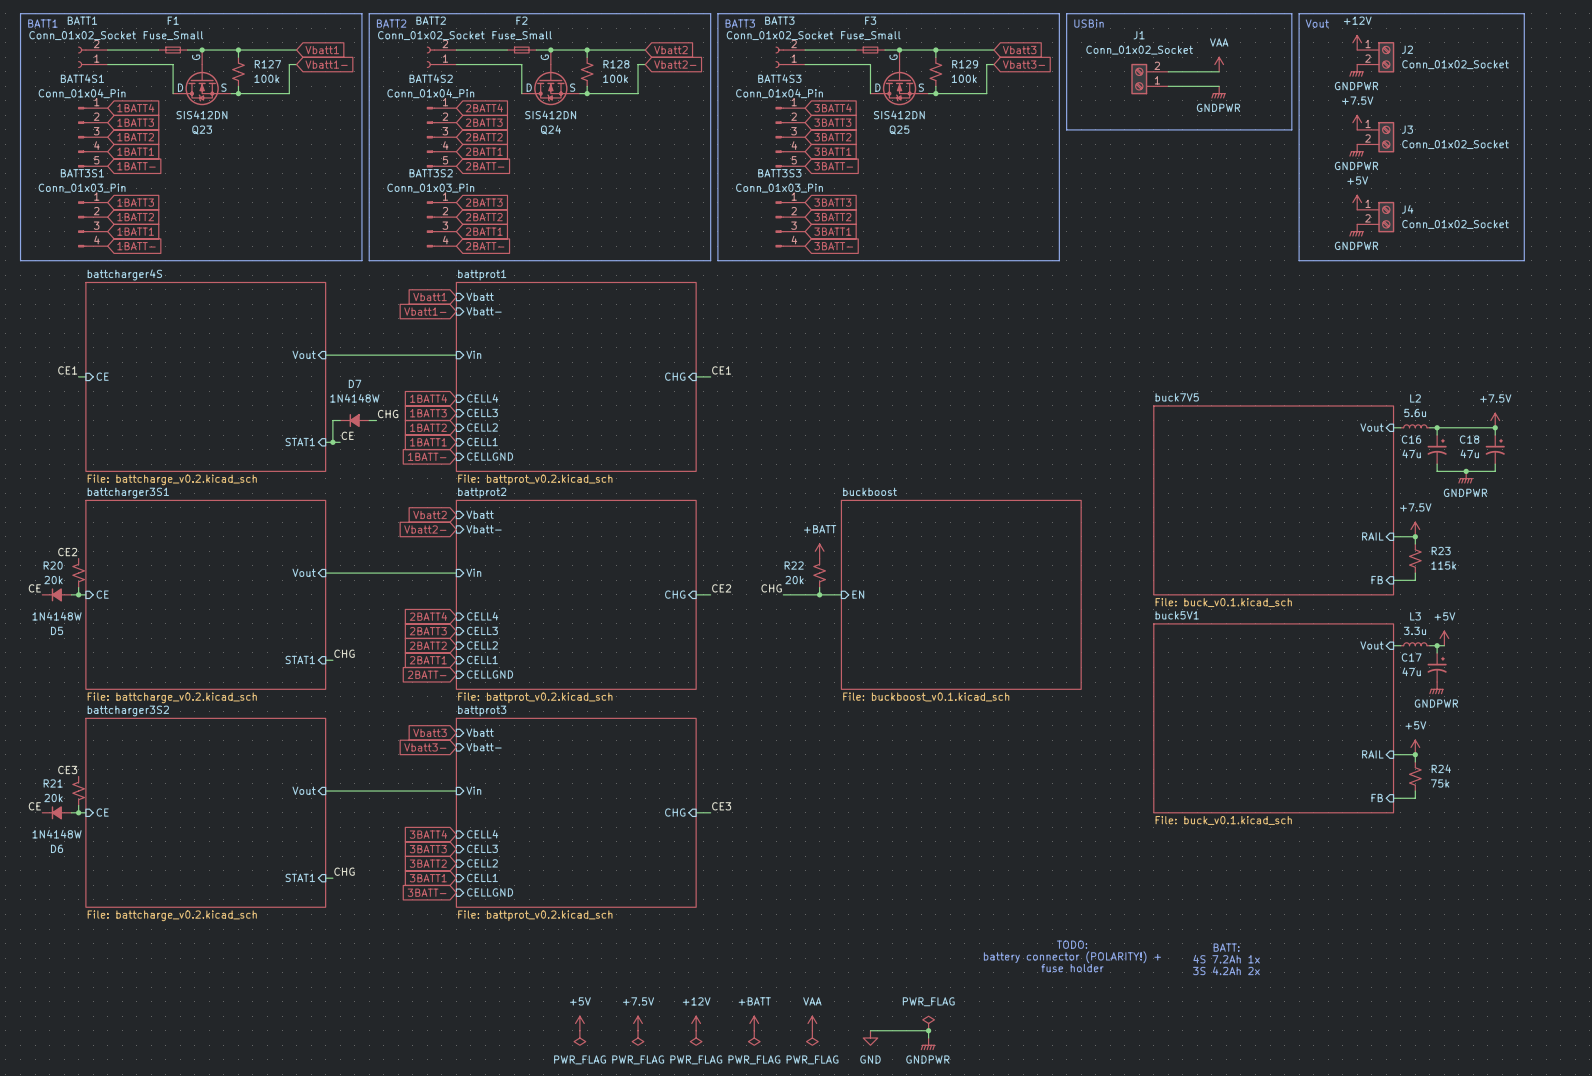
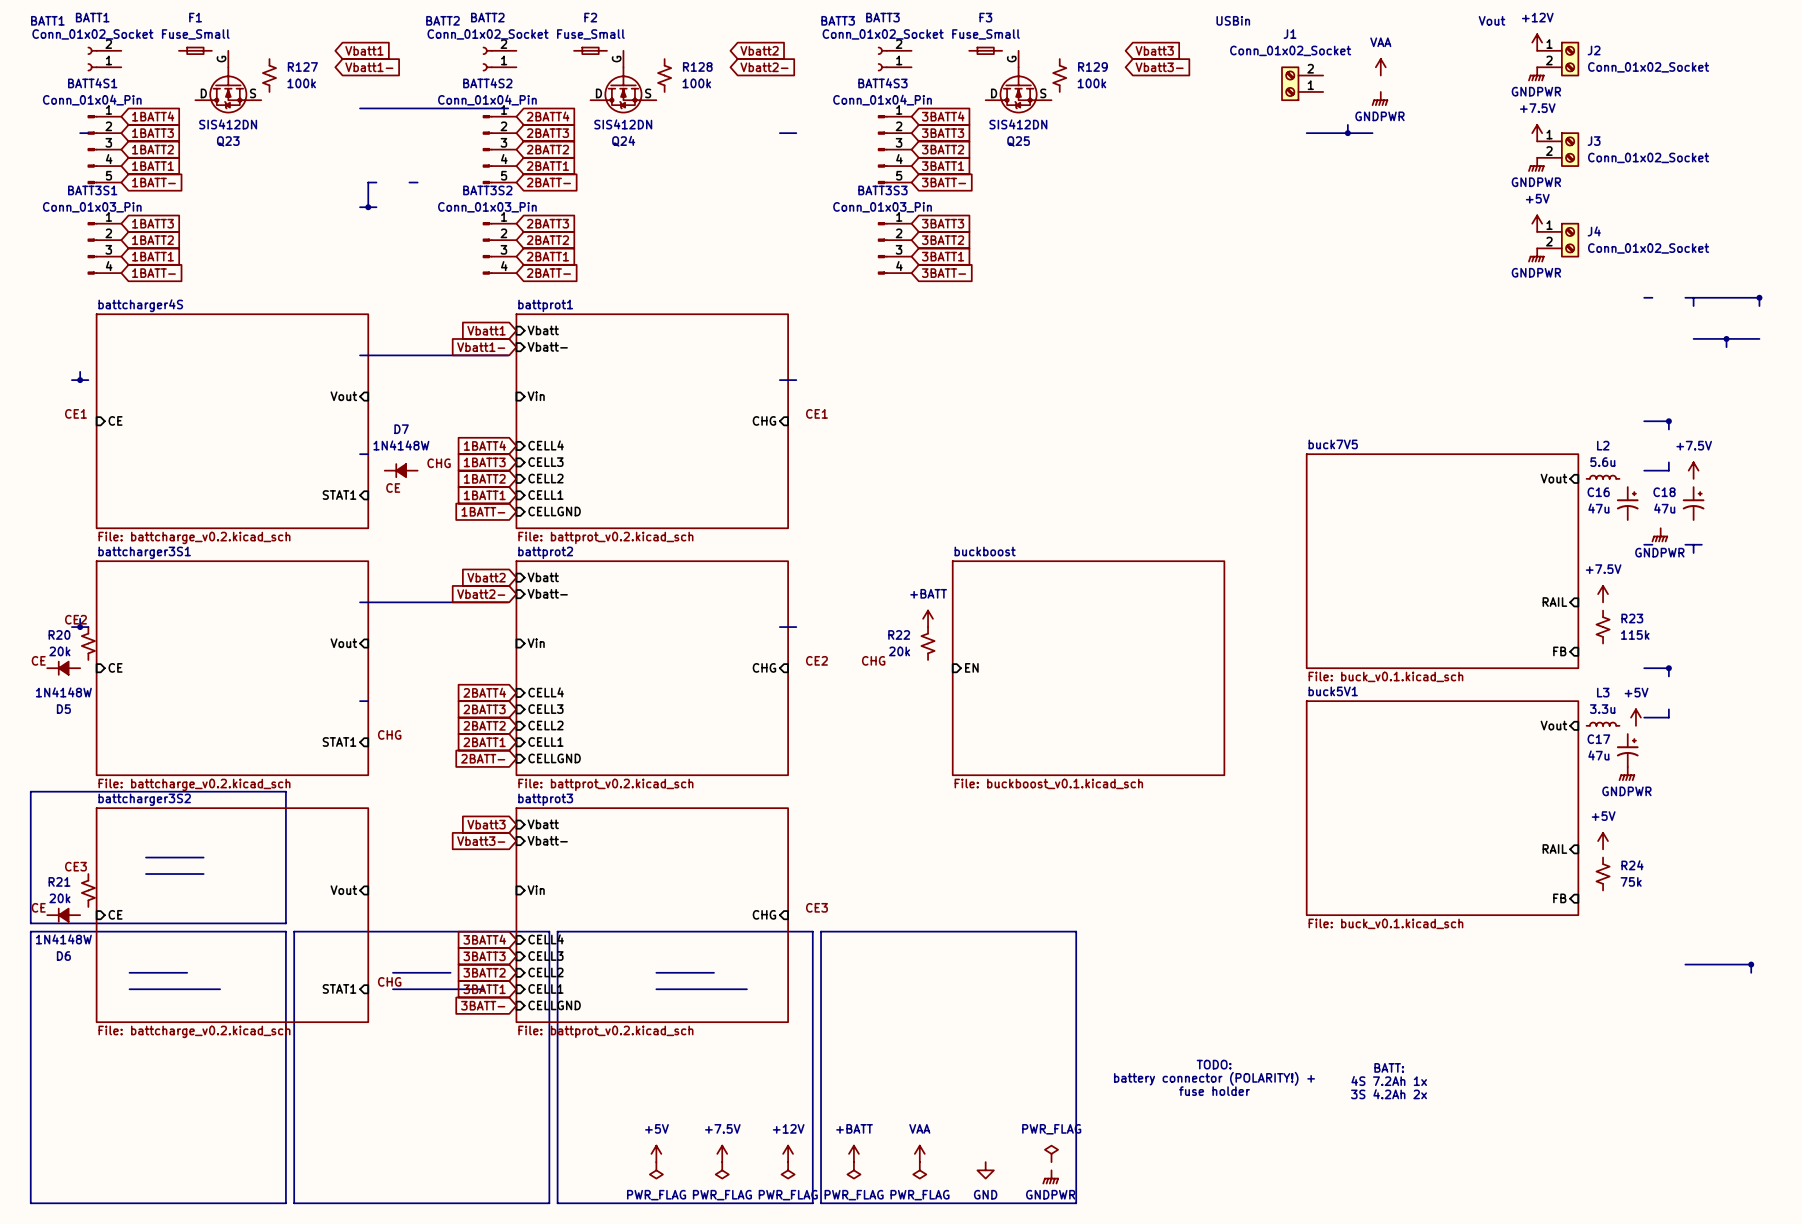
line: (20, 13) (361, 13) (361, 260) (20, 260) (20, 13) -> none
line: (369, 13) (710, 13) (710, 260) (369, 260) (369, 13) -> none
line: (717, 13) (1059, 13) (1059, 260) (717, 260) (717, 13) -> none
line: (1066, 13) (1291, 13) (1291, 129) (1066, 129) (1066, 13) -> none
line: (1299, 13) (1524, 13) (1524, 260) (1299, 260) (1299, 13) -> none
wire: (107, 50) (158, 50) -> none
wire: (187, 50) (296, 50) -> none
junction: (202, 50) -> none
wire: (238, 50) (238, 57) -> none
junction: (238, 50) -> none
wire: (456, 50) (507, 50) -> none
wire: (536, 50) (645, 50) -> none
junction: (550, 50) -> none
wire: (587, 50) (587, 57) -> none
junction: (587, 50) -> none
wire: (805, 50) (855, 50) -> none
wire: (885, 50) (993, 50) -> none
junction: (899, 50) -> none
wire: (935, 50) (935, 57) -> none
junction: (935, 50) -> none
wire: (107, 64) (173, 64) (173, 93) -> none
wire: (296, 64) (289, 64) (289, 93) (231, 93) -> none
wire: (456, 64) (521, 64) (521, 93) -> none
wire: (645, 64) (638, 64) (638, 93) (579, 93) -> none
wire: (805, 64) (870, 64) (870, 93) -> none
wire: (993, 64) (986, 64) (986, 93) (928, 93) -> none
wire: (1168, 71) (1219, 71) -> none
wire: (238, 86) (238, 93) -> none
wire: (587, 86) (587, 93) -> none
wire: (935, 86) (935, 93) -> none
wire: (1168, 86) (1219, 86) -> none
junction: (238, 93) -> none
junction: (587, 93) -> none
junction: (935, 93) -> none
wire: none -> (360, 108) (508, 108)
wire: none -> (1347, 124) (1347, 133)
wire: none -> (80, 133) (88, 133)
wire: none -> (779, 133) (796, 133)
wire: none -> (1306, 133) (1372, 133)
junction: none -> (1347, 133)
wire: none -> (376, 182) (368, 182) (368, 207)
wire: none -> (409, 182) (417, 182)
wire: none -> (360, 207) (376, 207)
junction: none -> (368, 207)
wire: none -> (1644, 297) (1652, 297)
wire: none -> (1685, 297) (1759, 297) (1759, 306)
wire: none -> (1693, 297) (1693, 306)
junction: none -> (1759, 297)
wire: none -> (1693, 338) (1759, 338)
wire: none -> (1726, 338) (1726, 347)
junction: none -> (1726, 338)
wire: none -> (80, 371) (80, 380)
wire: none -> (71, 380) (88, 380)
junction: none -> (80, 380)
wire: (325, 355) (456, 355) -> (360, 355) (508, 355)
wire: (78, 376) (85, 376) -> none
wire: (696, 376) (710, 376) -> (779, 380) (796, 380)
wire: none -> (1644, 421) (1668, 421) (1668, 429)
junction: none -> (1668, 421)
wire: none -> (1668, 462) (1668, 470) (1644, 470)
wire: (340, 420) (332, 420) (332, 442) -> none
wire: (369, 420) (376, 420) -> (360, 454) (368, 454)
wire: (1393, 427) (1400, 427) -> (1644, 544) (1652, 544)
wire: (1429, 427) (1495, 427) (1495, 435) -> none
wire: (1437, 427) (1437, 435) -> (1693, 544) (1693, 552)
junction: (1437, 427) -> none
junction: (1495, 427) -> none
wire: (325, 442) (340, 442) -> none
junction: (332, 442) -> none
wire: (1437, 464) (1437, 471) (1495, 471) (1495, 464) -> none
junction: (1466, 471) -> none
wire: none -> (1685, 544) (1701, 544)
wire: (1393, 536) (1415, 536) (1415, 544) -> (1644, 668) (1668, 668) (1668, 676)
junction: (1415, 536) -> none
junction: none -> (80, 627)
wire: (325, 573) (456, 573) -> (360, 602) (508, 602)
wire: (1415, 573) (1415, 580) (1393, 580) -> (1668, 709) (1668, 717) (1644, 717)
wire: (78, 587) (78, 594) -> (80, 618) (80, 627)
wire: (819, 587) (819, 594) -> none
wire: (71, 594) (85, 594) -> (71, 627) (88, 627)
junction: (78, 594) -> none
wire: (696, 594) (710, 594) -> (779, 627) (796, 627)
wire: (783, 594) (841, 594) -> none
junction: (819, 594) -> none
junction: none -> (1668, 668)
wire: (1393, 645) (1400, 645) -> none
wire: (1429, 645) (1444, 645) -> none
wire: (1437, 645) (1437, 652) -> none
junction: (1437, 645) -> none
wire: (325, 660) (332, 660) -> (360, 701) (368, 701)
line: none -> (30, 791) (285, 791) (285, 923) (30, 923) (30, 791)
wire: (1393, 754) (1415, 754) (1415, 761) -> none
junction: (1415, 754) -> none
wire: none -> (146, 857) (203, 857)
wire: none -> (146, 874) (203, 874)
wire: (325, 791) (456, 791) -> none
wire: (1415, 791) (1415, 798) (1393, 798) -> none
wire: (78, 805) (78, 812) -> none
wire: (71, 812) (85, 812) -> none
junction: (78, 812) -> none
wire: (696, 812) (710, 812) -> none
line: none -> (30, 931) (285, 931) (285, 1203) (30, 1203) (30, 931)
line: none -> (294, 931) (549, 931) (549, 1203) (294, 1203) (294, 931)
line: none -> (557, 931) (812, 931) (812, 1203) (557, 1203) (557, 931)
line: none -> (821, 931) (1076, 931) (1076, 1203) (821, 1203) (821, 931)
wire: none -> (1685, 964) (1751, 964) (1751, 972)
junction: none -> (1751, 964)
wire: none -> (129, 972) (187, 972)
wire: none -> (392, 972) (450, 972)
wire: none -> (656, 972) (714, 972)
wire: none -> (129, 989) (220, 989)
wire: (325, 878) (332, 878) -> none
wire: none -> (392, 989) (483, 989)
wire: none -> (656, 989) (746, 989)
wire: (870, 1030) (928, 1030) (928, 1038) -> none
junction: (928, 1030) -> none

